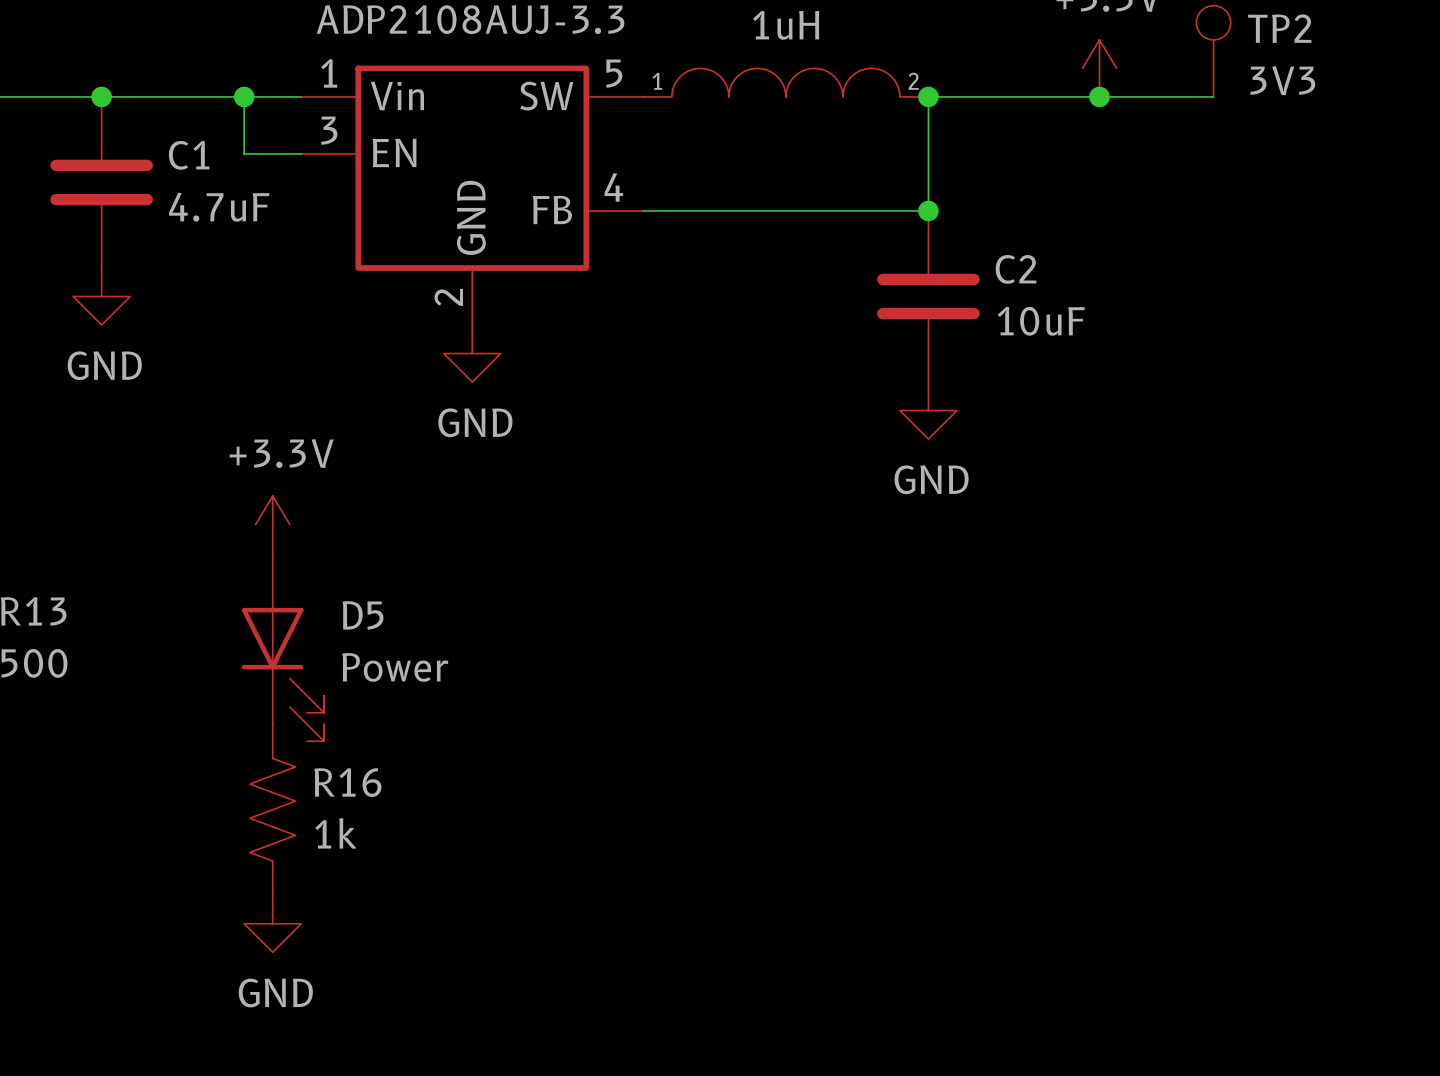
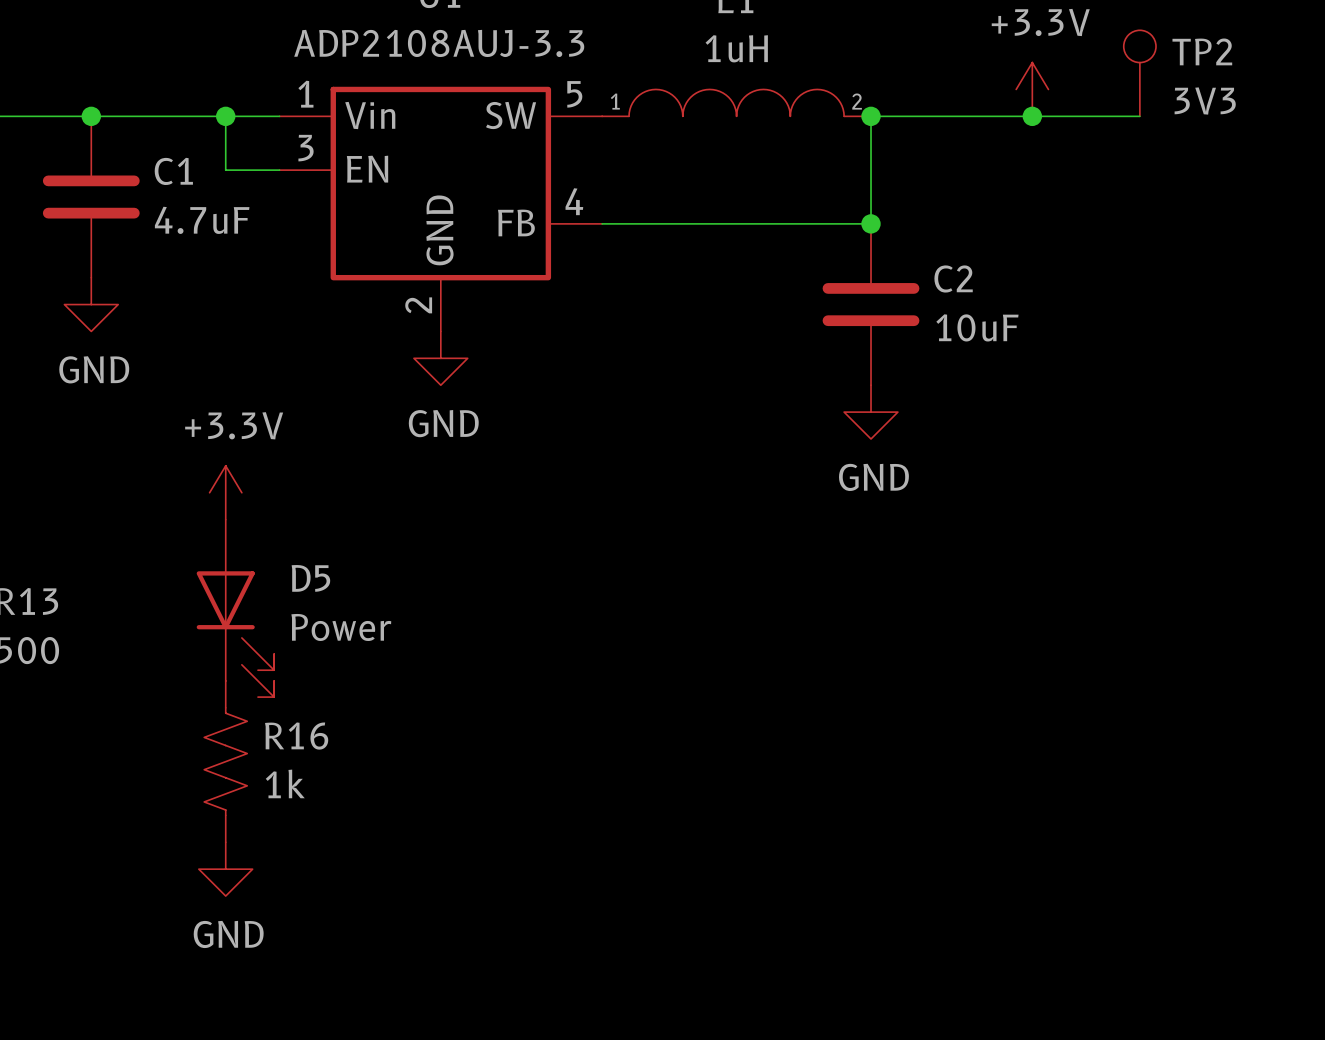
power symbol position: +3.3V (272, 524) -> +3.3V (225, 492)
D5 position: (282, 647) -> (235, 608)
R16 position: (272, 809) -> (225, 761)
power symbol position: GND (272, 923) -> GND (225, 869)

